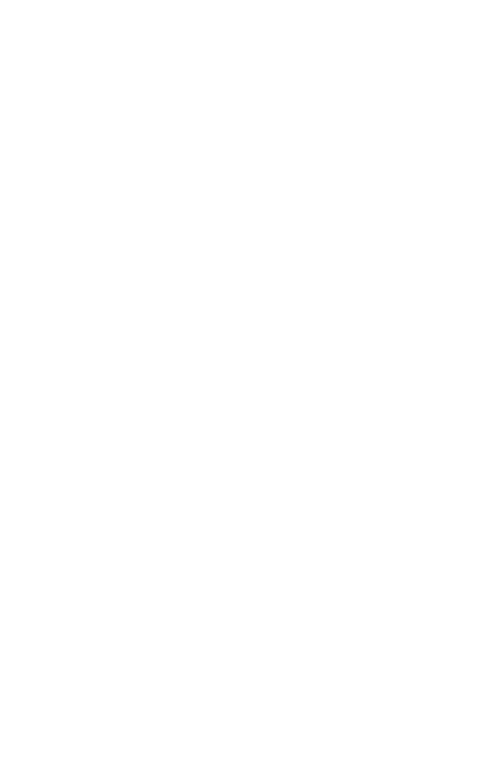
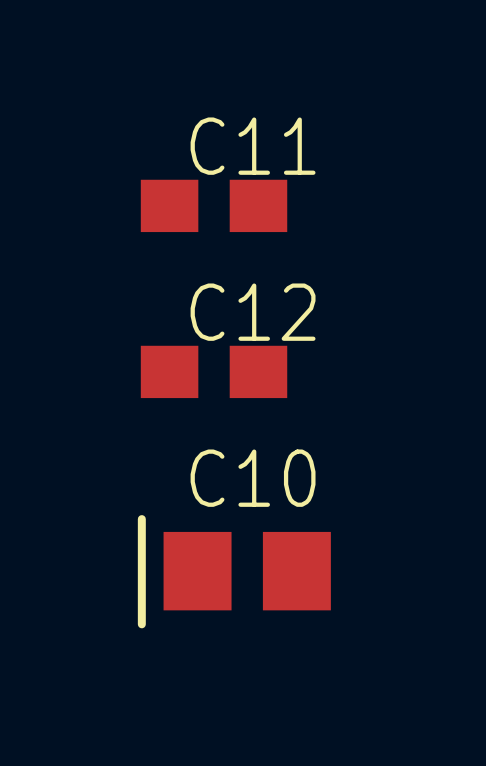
C11: none -> (214, 205)
C12: none -> (214, 371)
C10: none -> (234, 571)

